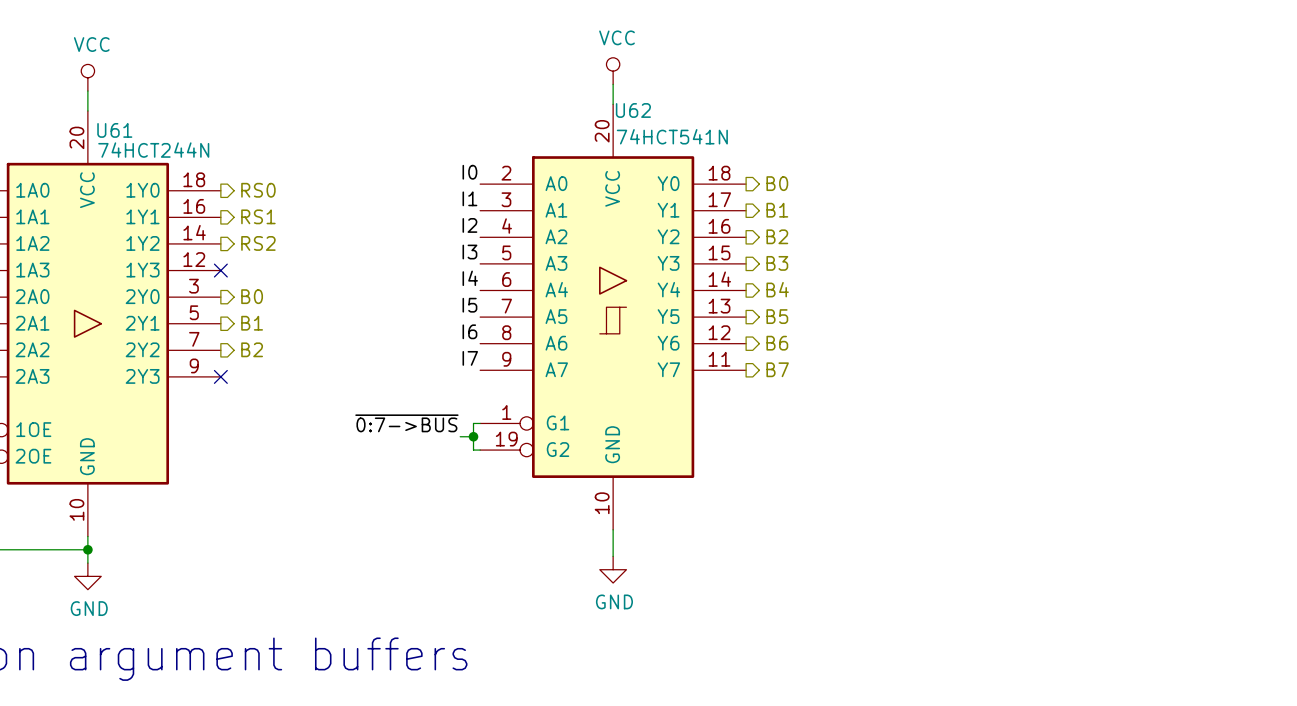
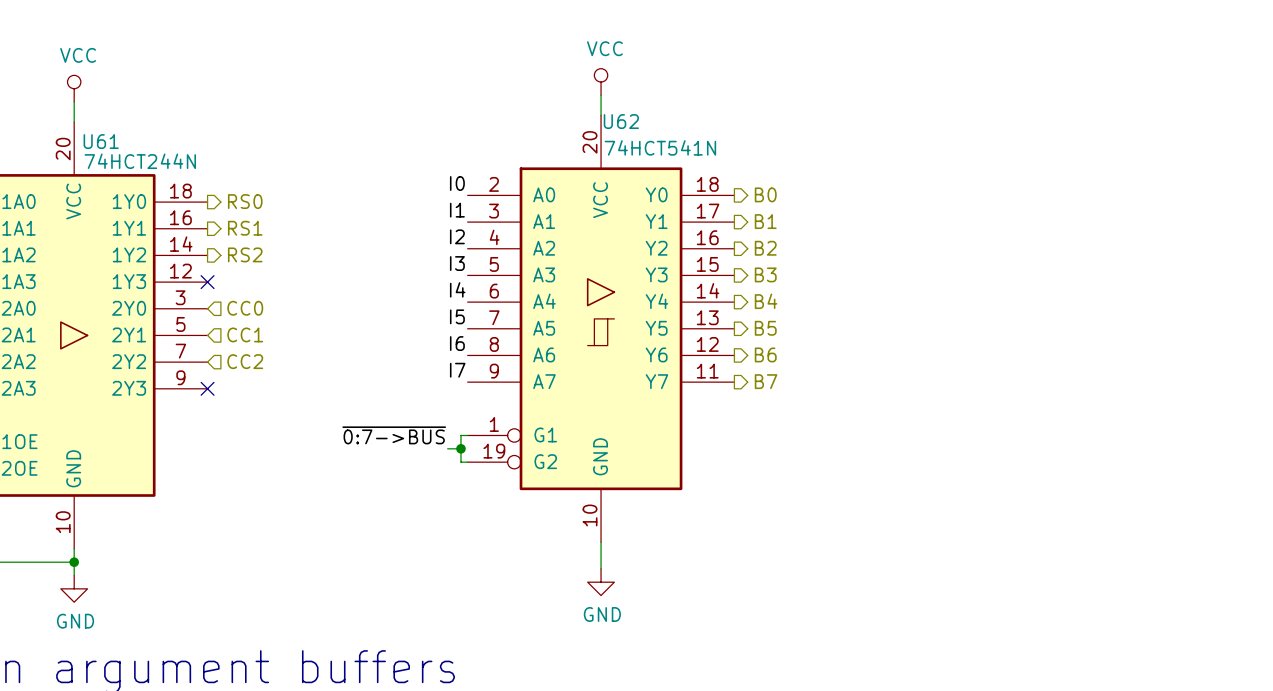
hierarchical label shape: output (252, 296) -> input (245, 308)
hierarchical label: B0 (252, 296) -> CC0 (245, 308)
hierarchical label shape: output (252, 323) -> input (245, 334)
hierarchical label: B1 (252, 323) -> CC1 (245, 334)
hierarchical label shape: output (252, 349) -> input (245, 361)
hierarchical label: B2 (252, 349) -> CC2 (245, 361)

